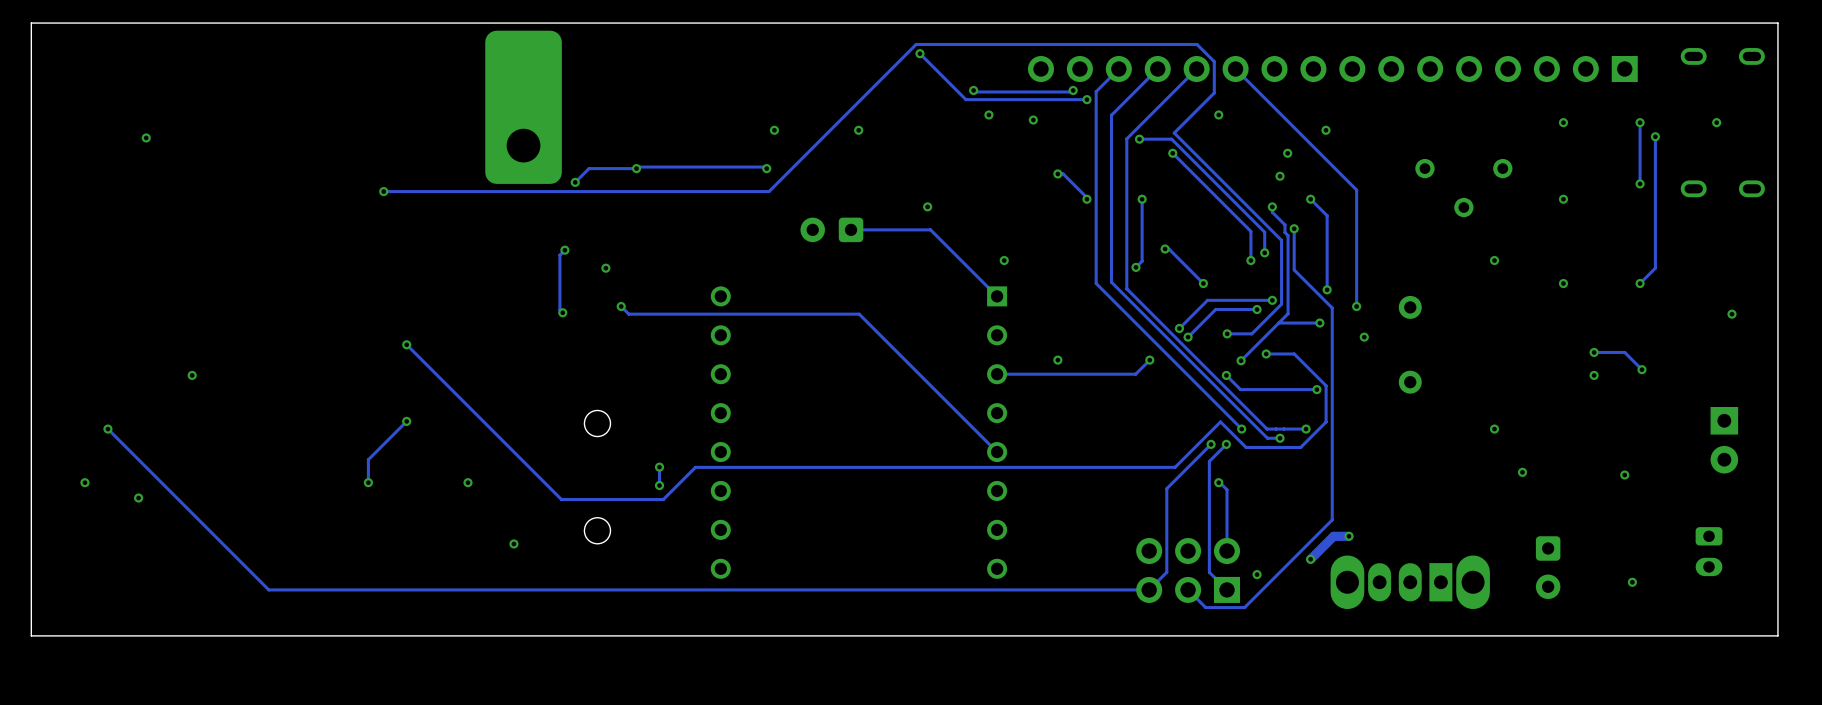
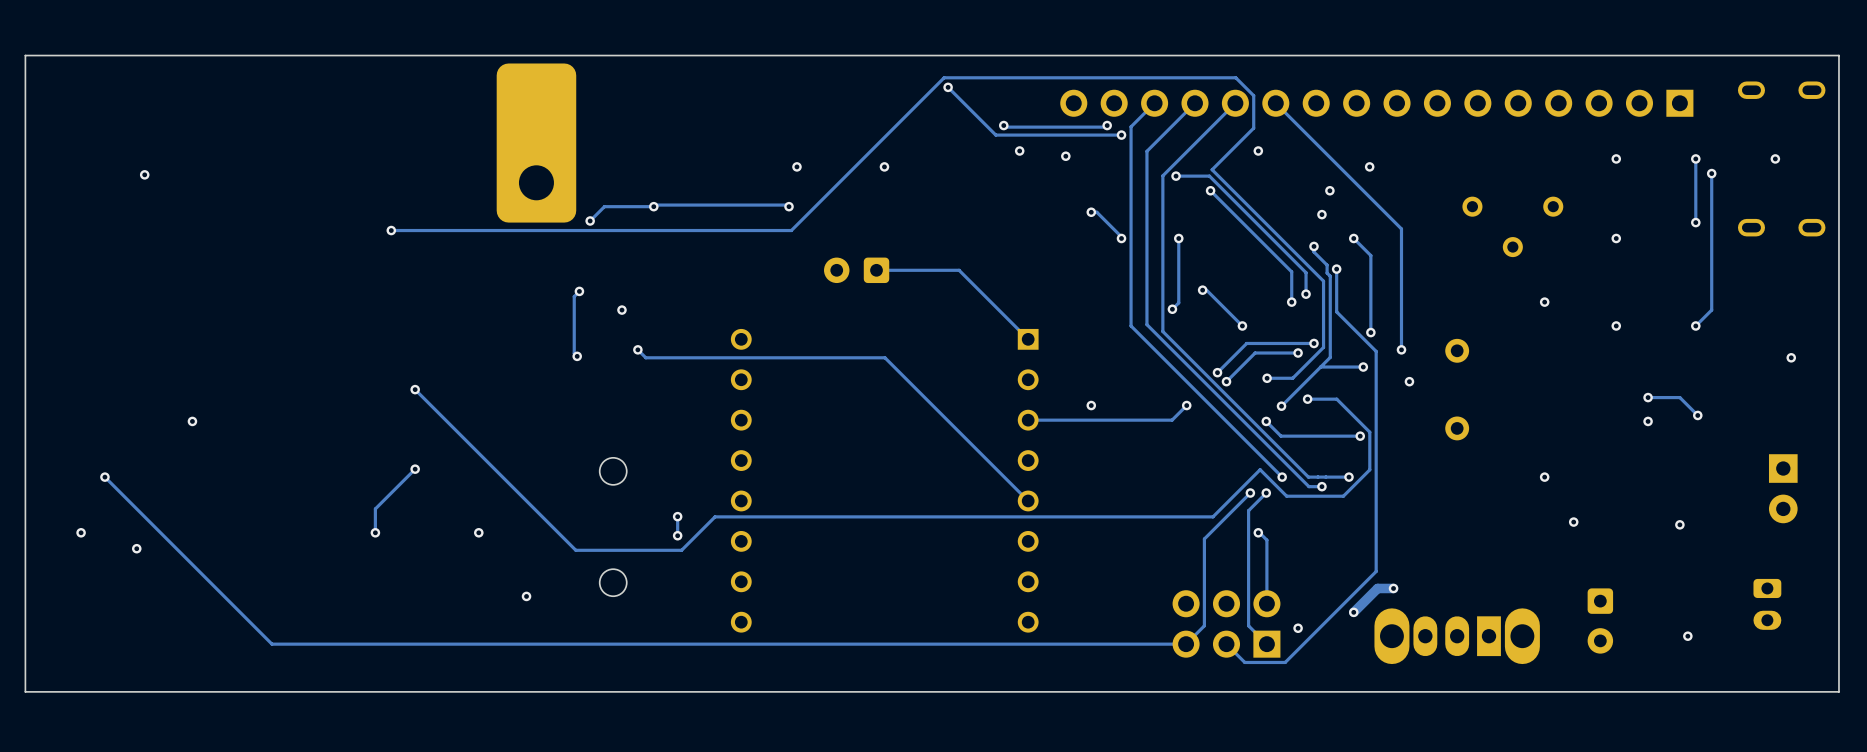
via: (927, 206) -> none
via: (1004, 260) -> none

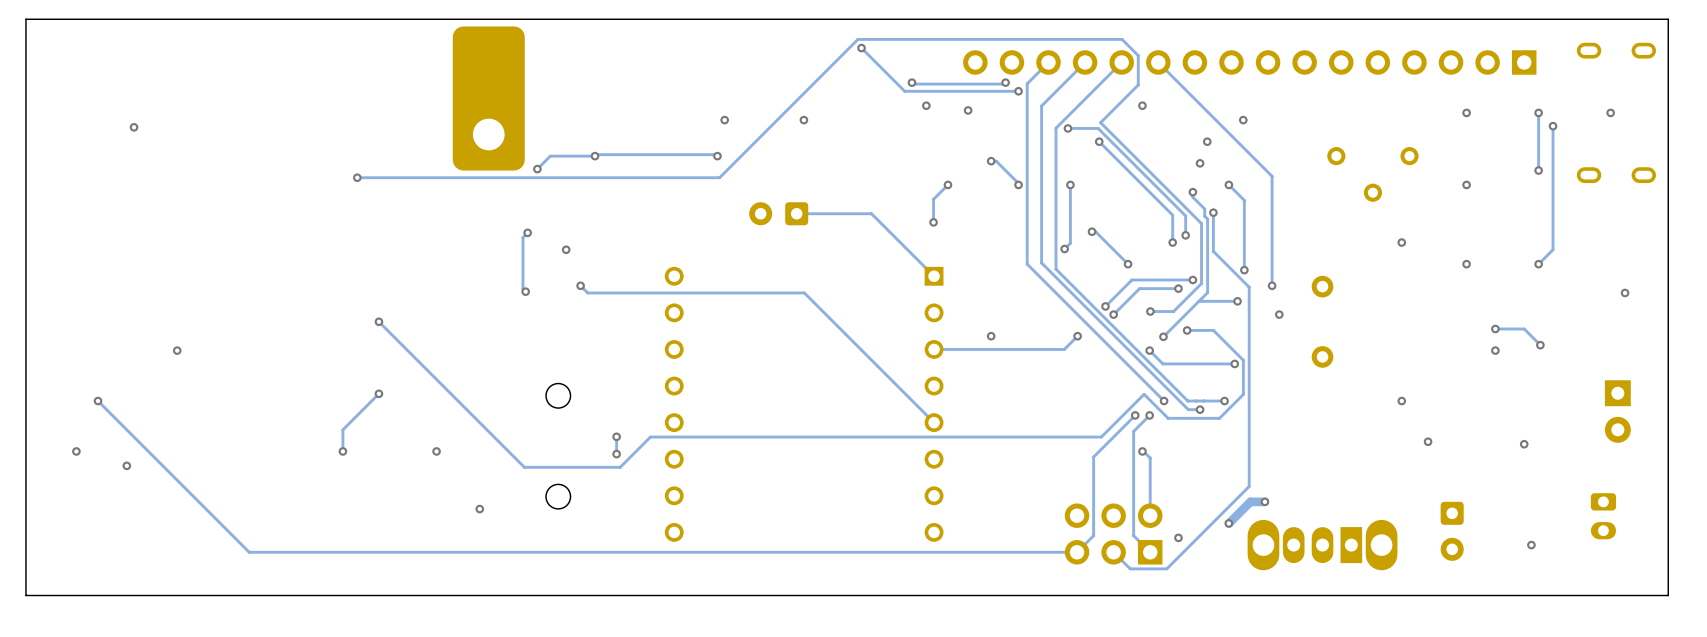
track: none -> (947, 184) (933, 199) (933, 222)
via: none -> (947, 184)
via: none -> (933, 222)

